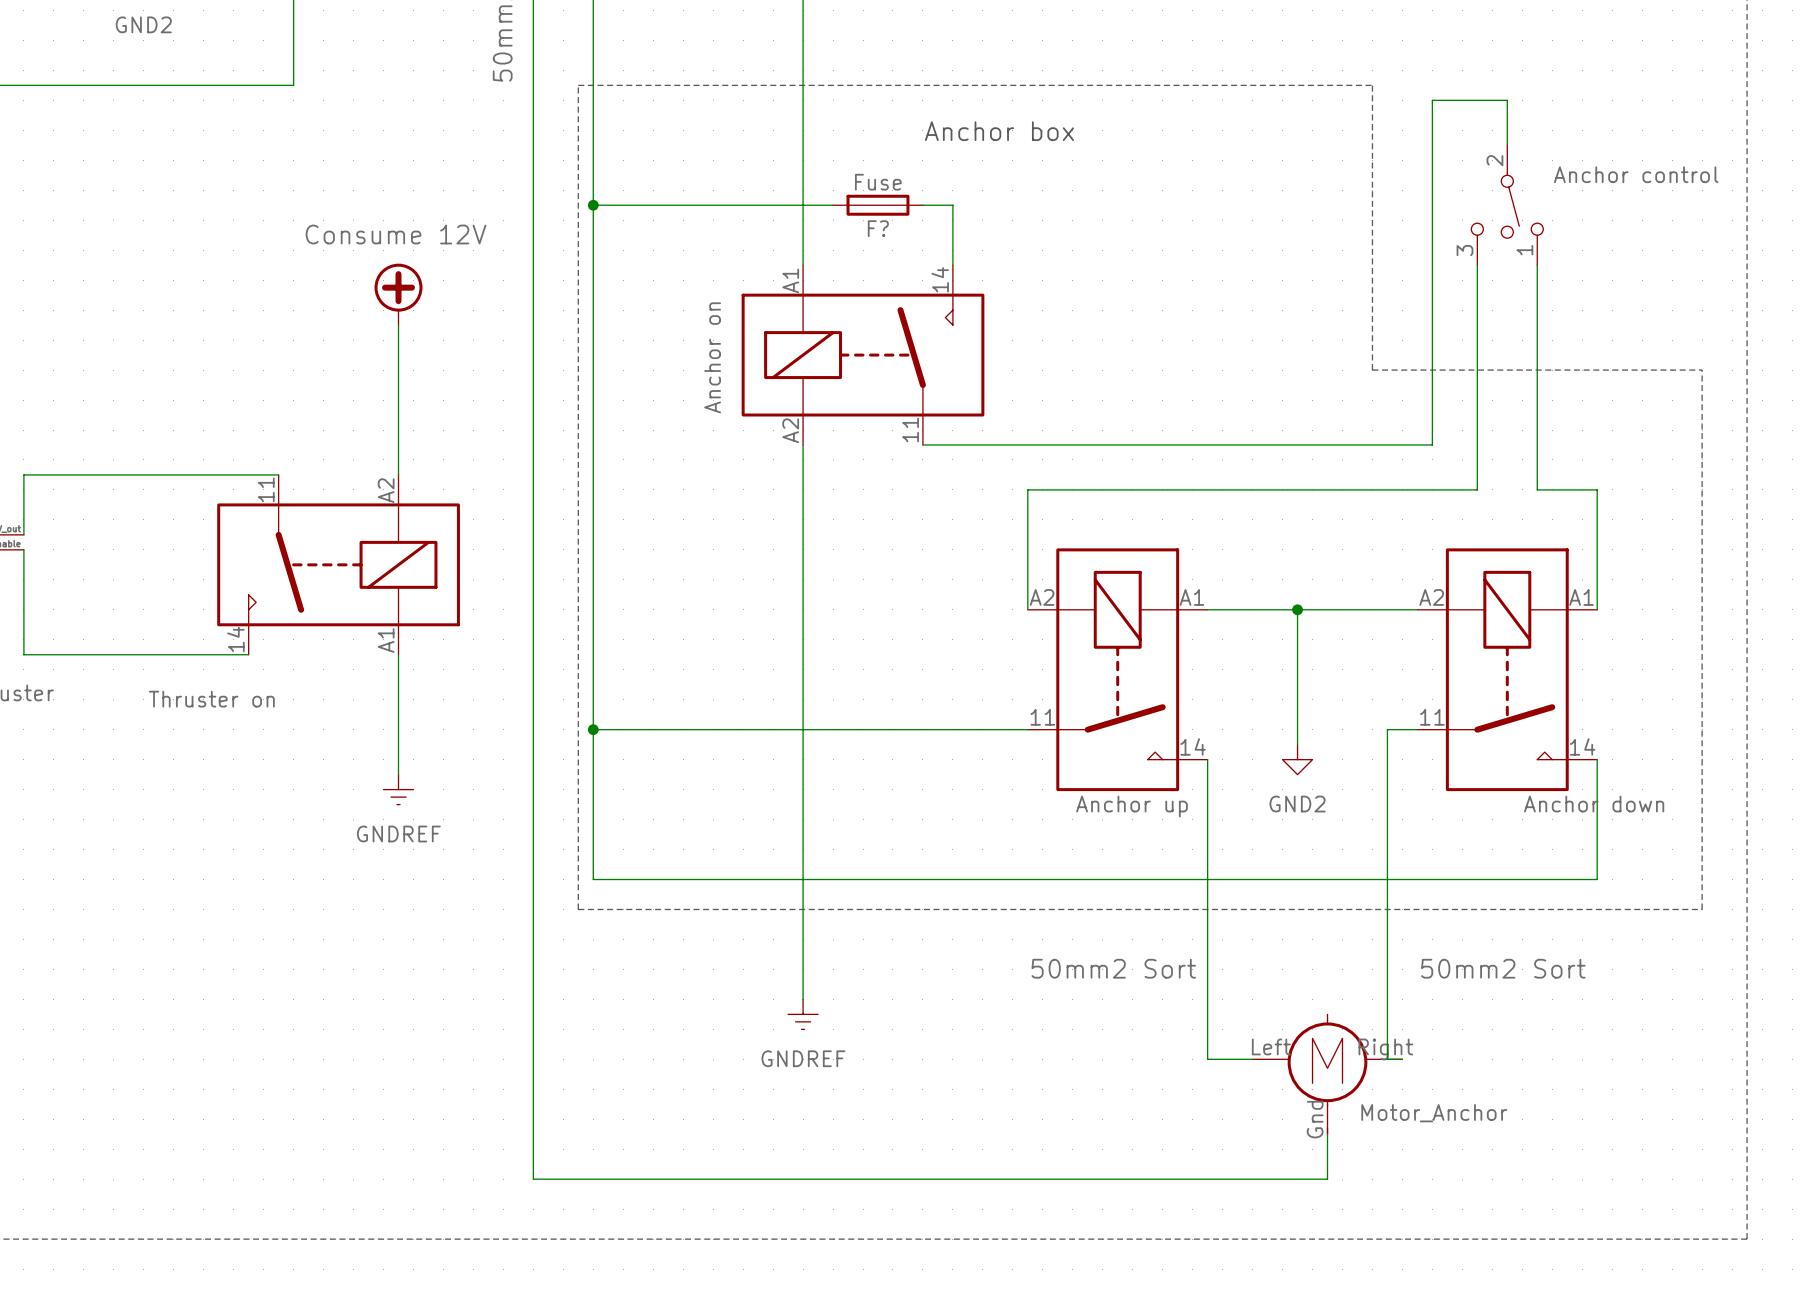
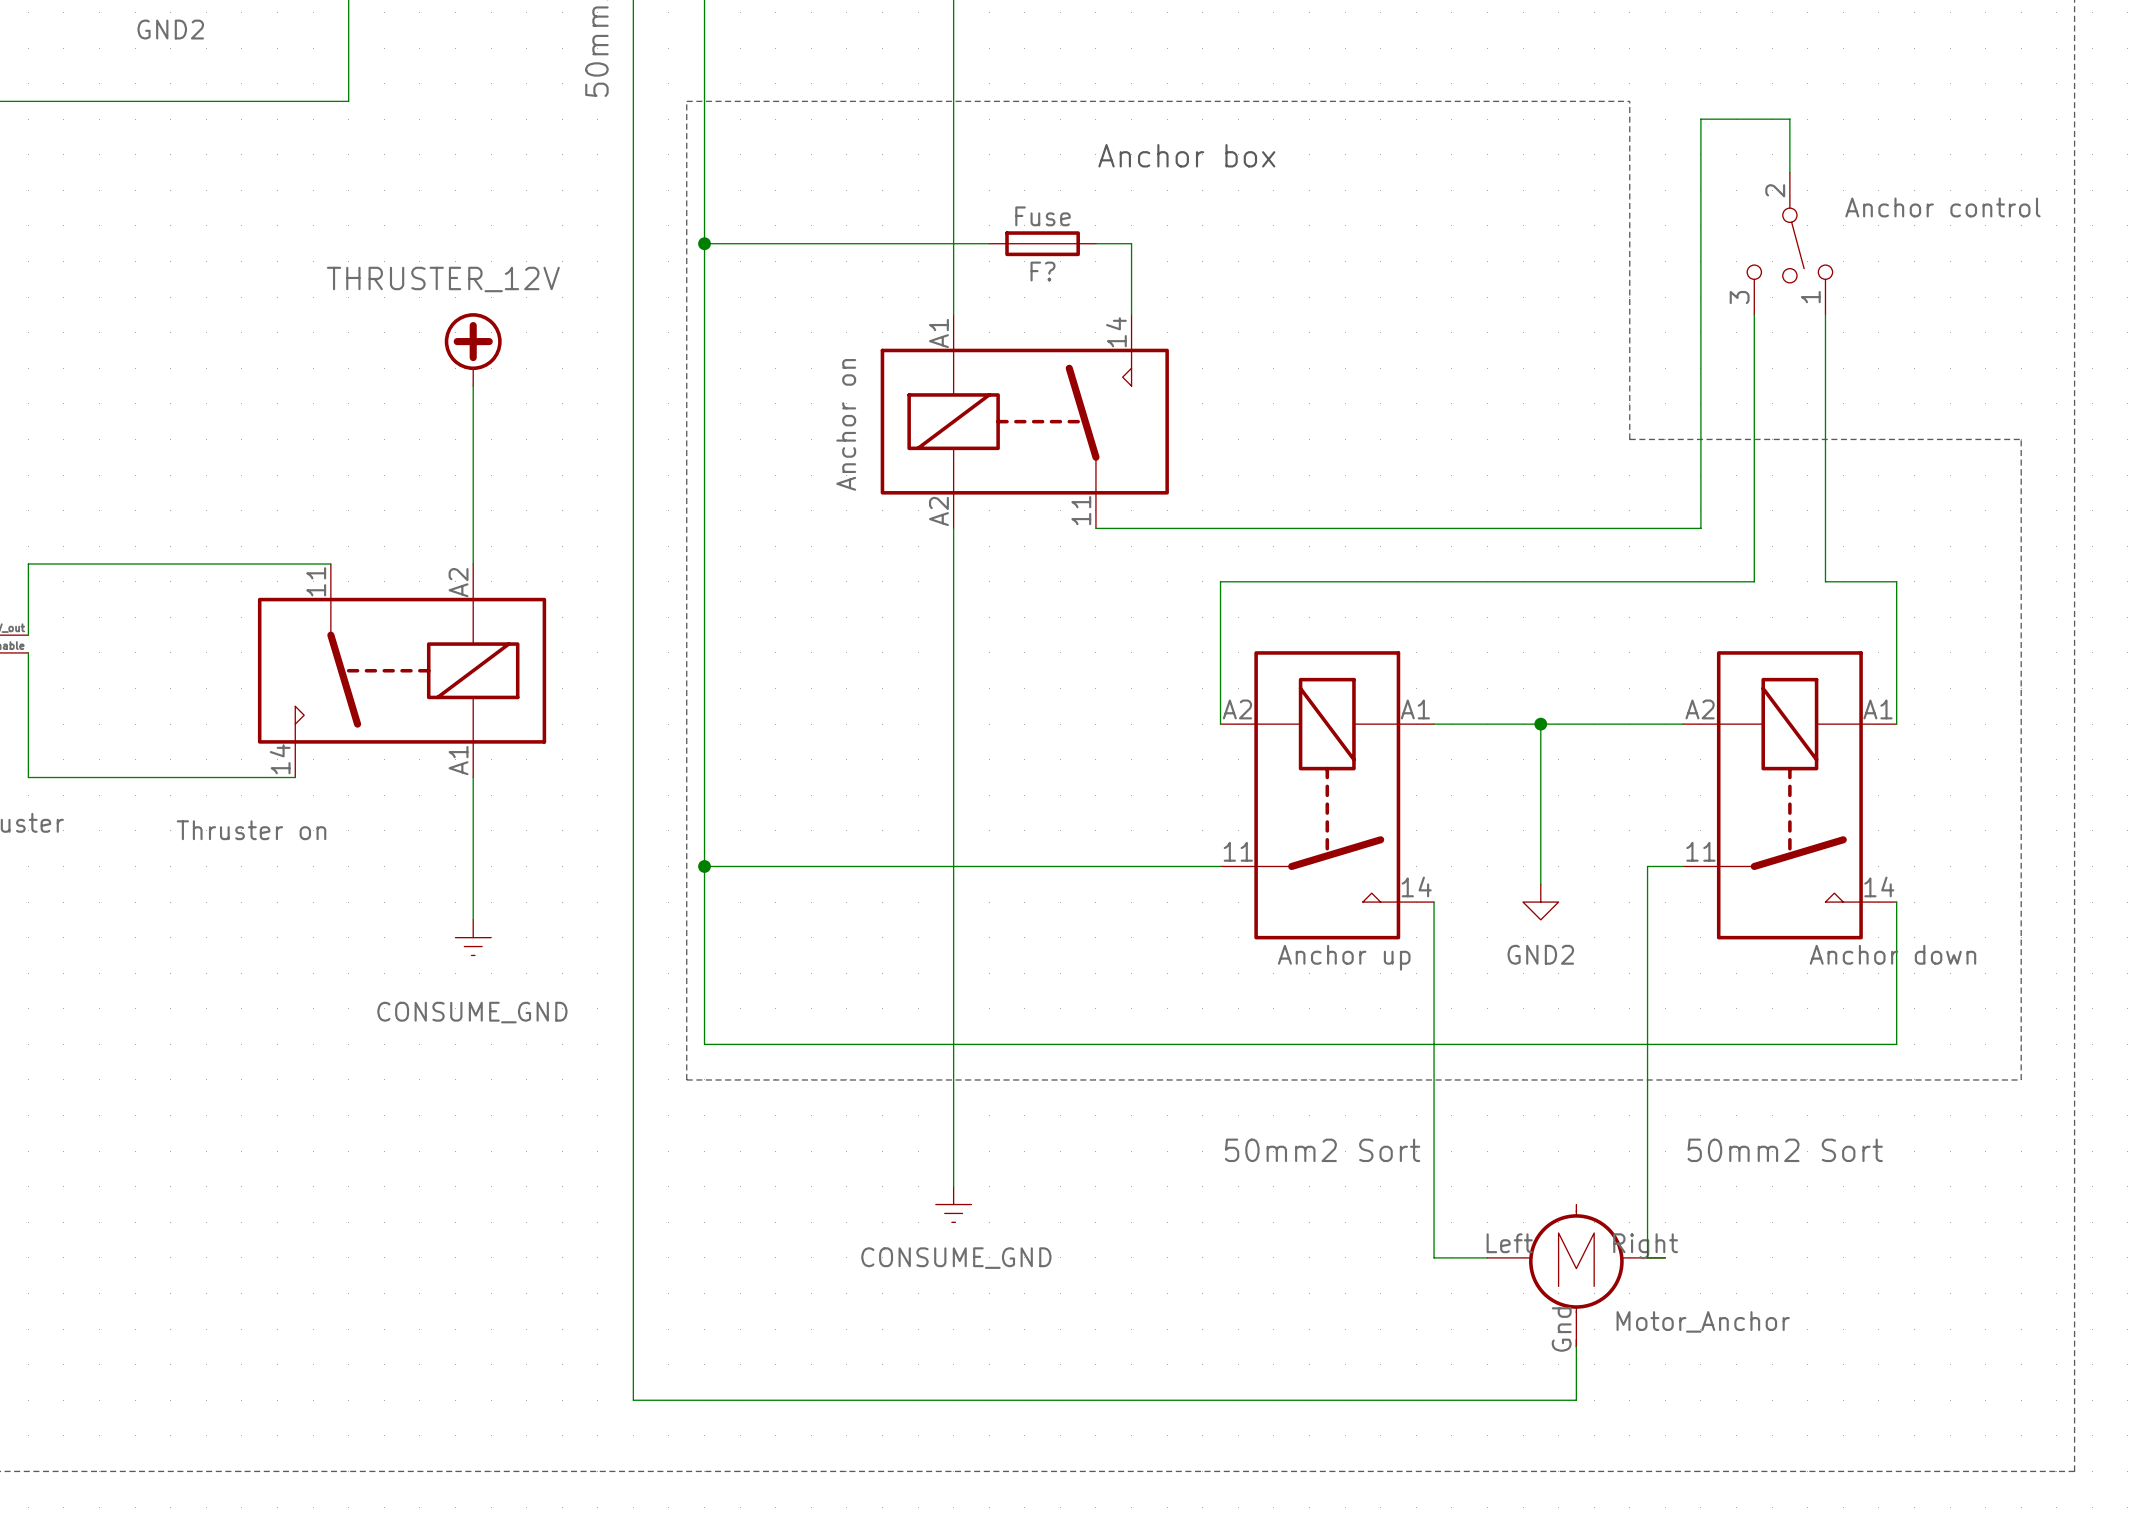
label: Consume 12V (396, 234) -> none
label: none -> THRUSTER_12V (443, 279)
power symbol: GNDREF (398, 789) -> CONSUME_GND (473, 937)
power symbol: GNDREF (803, 1014) -> CONSUME_GND (953, 1204)

